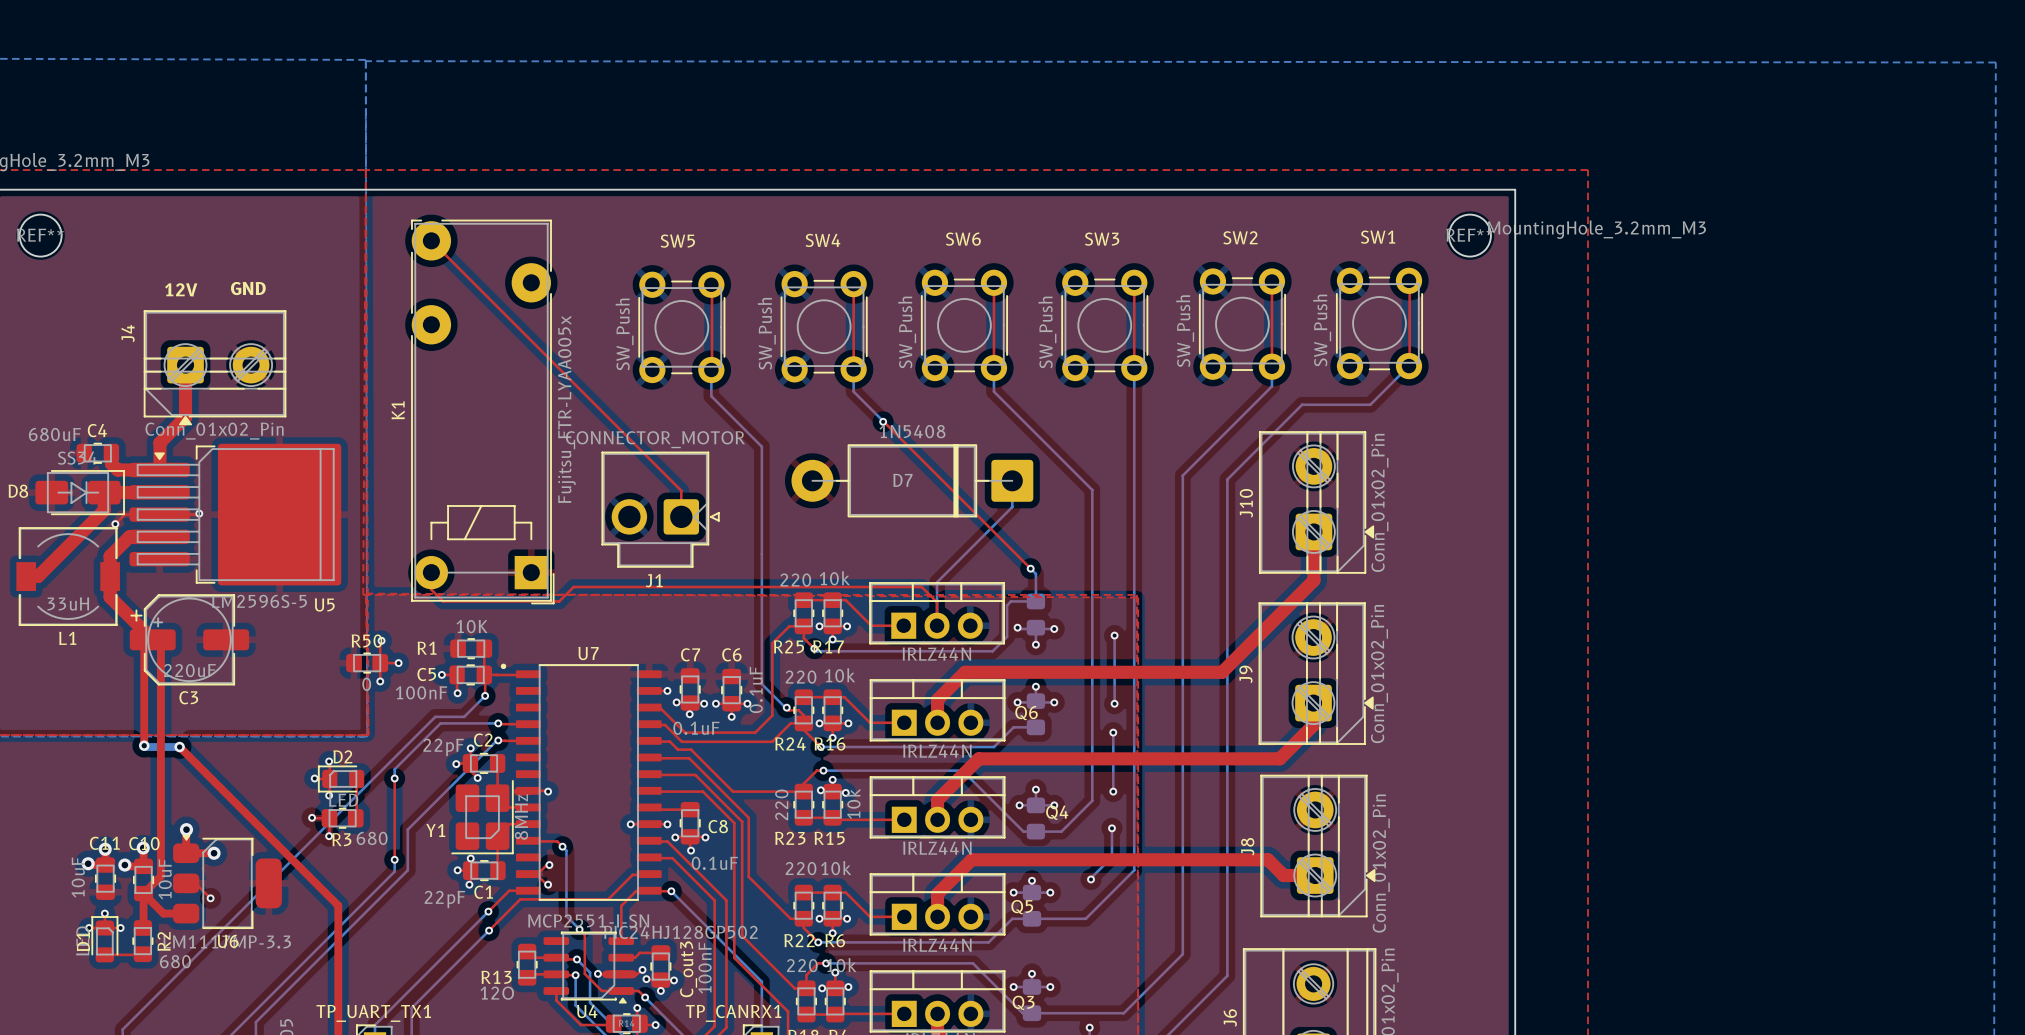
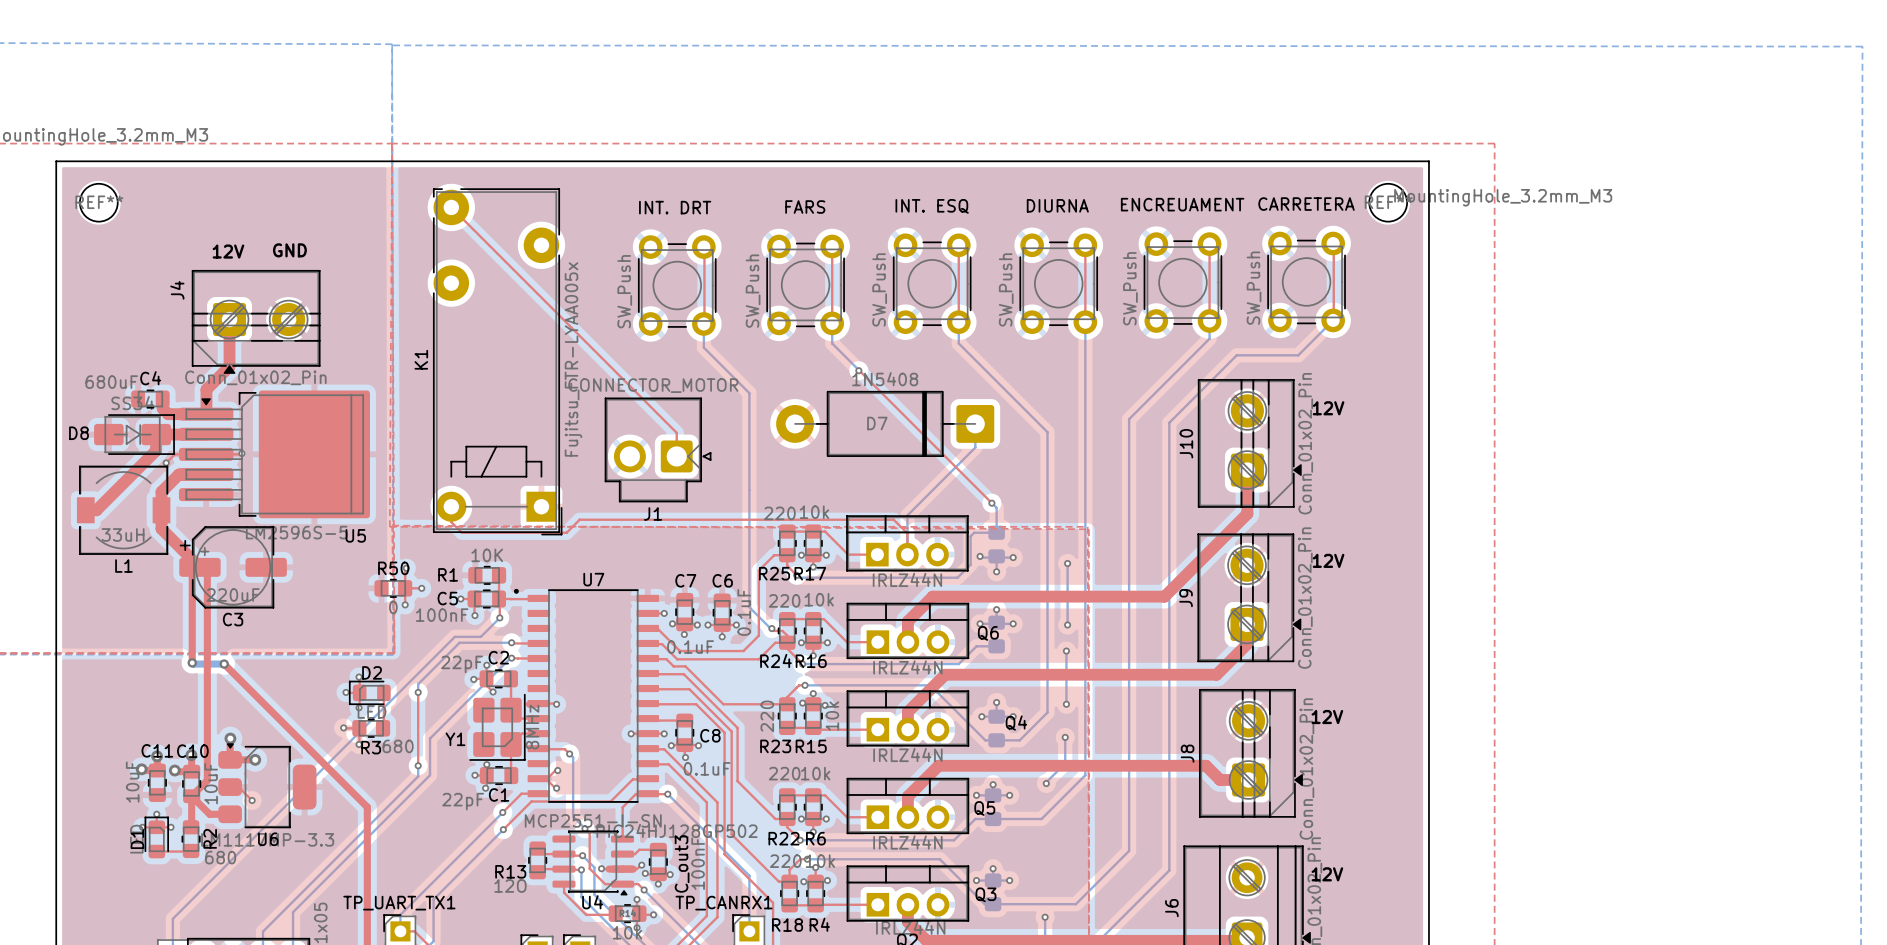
SW2 name: SW2 (1240, 237) -> ENCREUAMENT (1182, 204)
SW1 name: SW1 (1378, 237) -> CARRETERA (1306, 204)
SW6 name: SW6 (963, 239) -> INT. ESQ (932, 206)
SW3 name: SW3 (1102, 239) -> DIURNA (1057, 205)
SW4 name: SW4 (822, 240) -> FARS (805, 207)
SW5 name: SW5 (677, 241) -> INT. DRT (675, 207)
text: none -> 12V (1328, 408)
text: none -> 12V (1328, 560)
text: none -> 12V (1327, 717)
text: none -> 12V (1327, 874)

